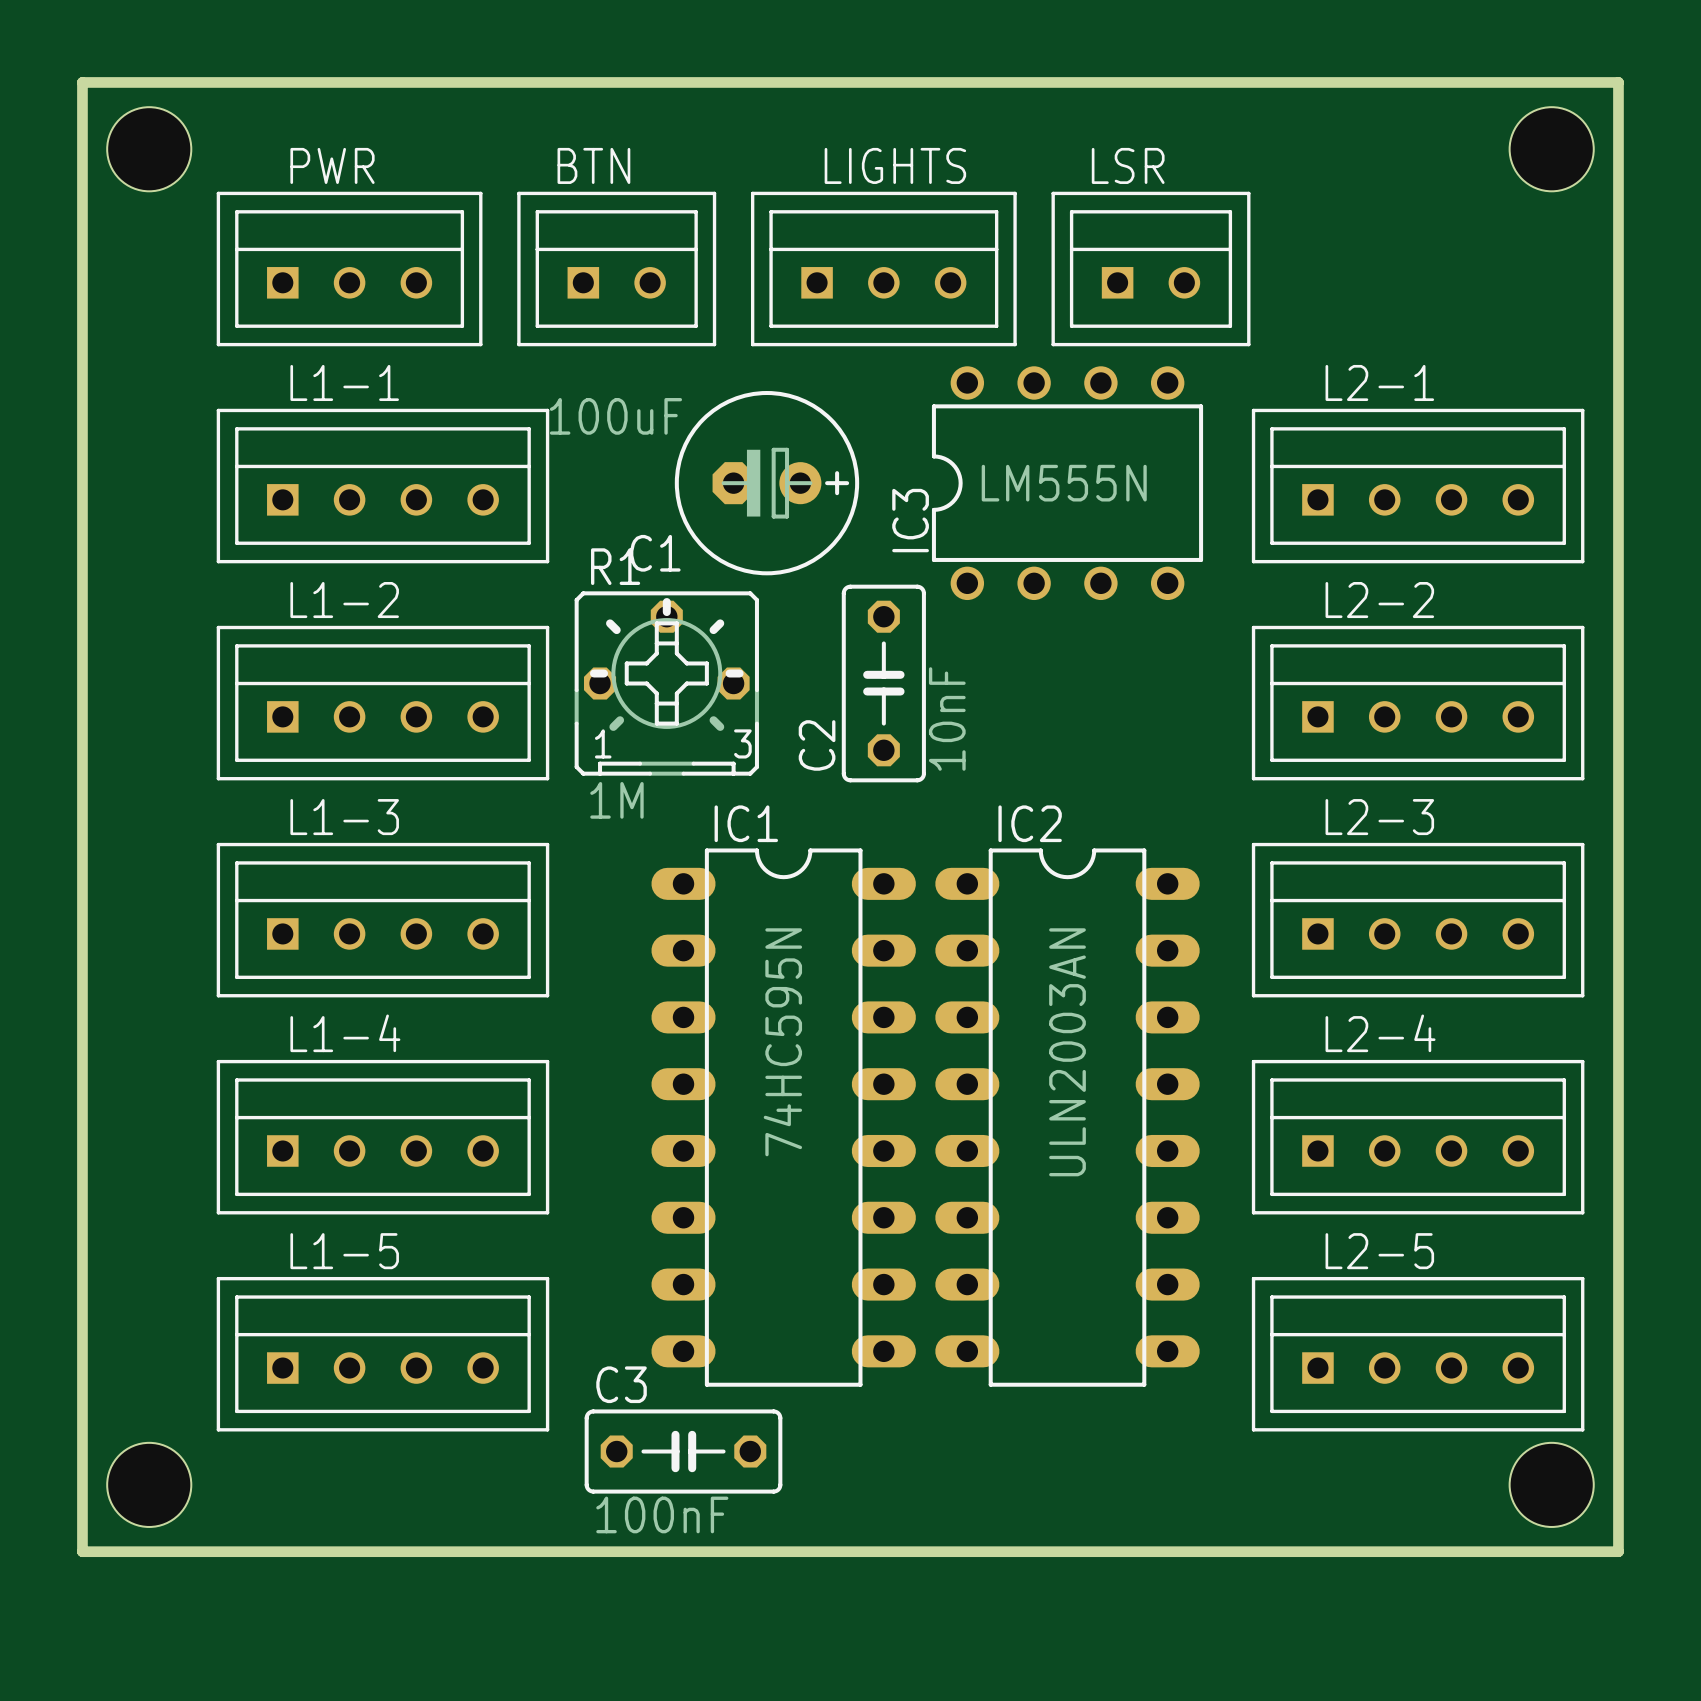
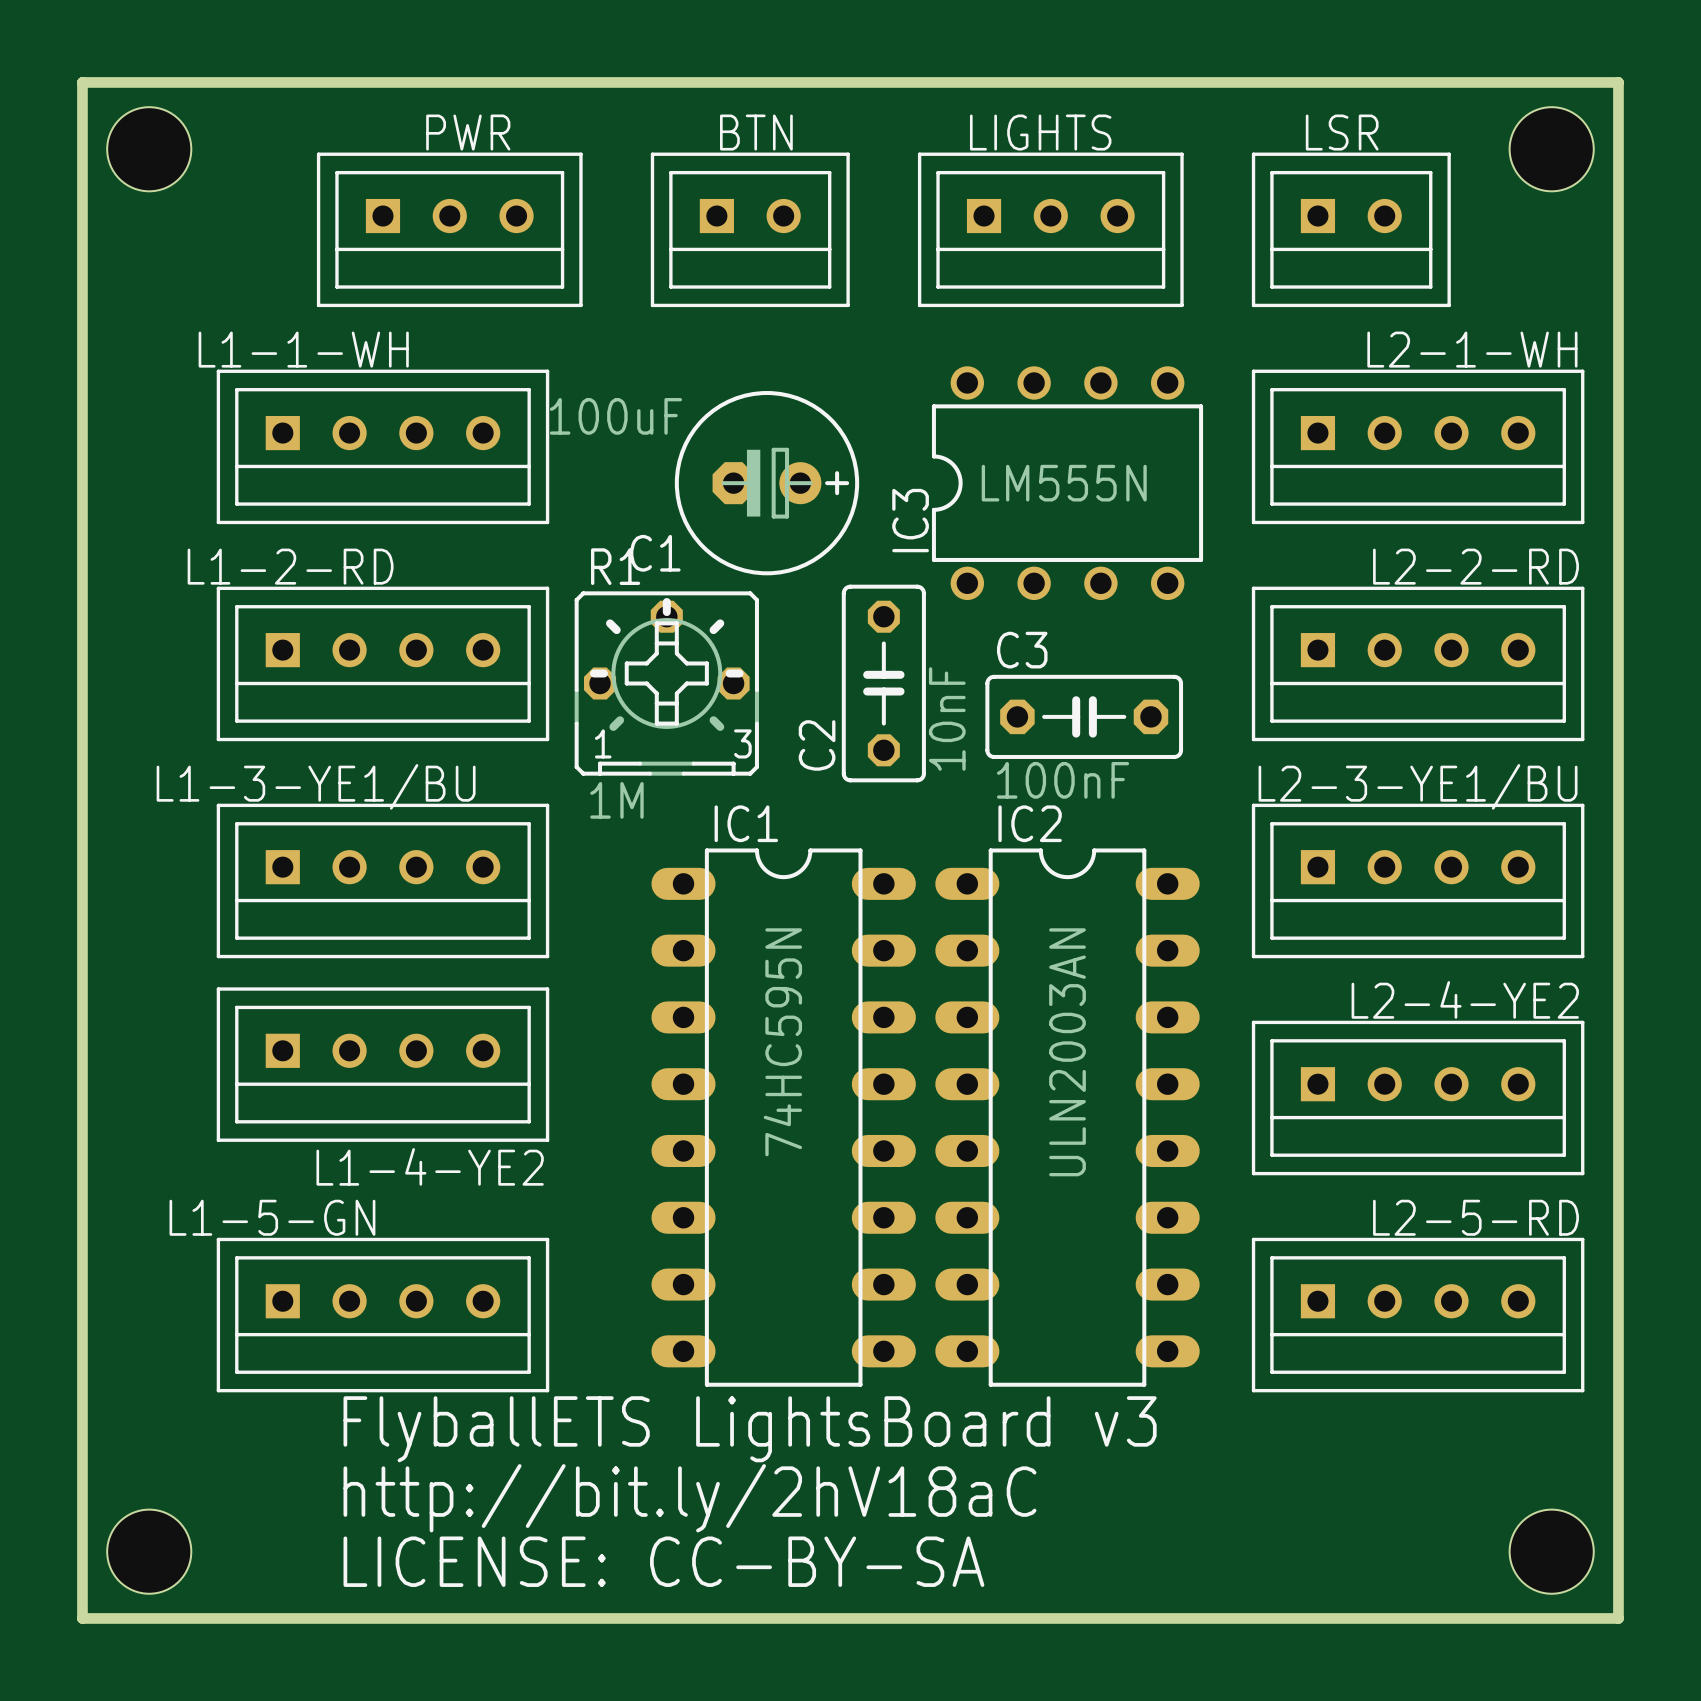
PWR: none -> (449, 229)
BTN: none -> (750, 229)
LIGHTS: none -> (1050, 229)
LSR: none -> (1351, 229)
PWR: (349, 269) -> none
BTN: (616, 269) -> none
LIGHTS: (883, 269) -> none
LSR: (1150, 269) -> none
L1-1-WH: none -> (382, 446)
L2-1-WH: none -> (1418, 446)
L1-1: (382, 486) -> none
L2-1: (1418, 486) -> none
L1-2-RD: none -> (382, 663)
L2-2-RD: none -> (1418, 663)
L1-2: (382, 703) -> none
L2-2: (1418, 703) -> none
L1-3-YE1/BU: none -> (382, 880)
L2-3-YE1/BU: none -> (1418, 880)
L1-3: (382, 920) -> none
L2-3: (1418, 920) -> none
L1-4-YE2: none -> (382, 1064)
L2-4-YE2: none -> (1418, 1098)
L1-4: (382, 1137) -> none
L2-4: (1418, 1137) -> none
L1-5-GN: none -> (382, 1315)
L2-5-RD: none -> (1418, 1315)
L1-5: (382, 1354) -> none
L2-5: (1418, 1354) -> none
C3 footprint: [584, 1409, 783, 1494] -> [985, 674, 1184, 759]
text: none -> FlyballETS LightsBoard v3 (750, 1429)
hole position: (149, 1484) -> (149, 1551)
hole position: (1551, 1484) -> (1551, 1551)
text: none -> http://bit.ly/2hV18aC (689, 1498)
board edge: (82, 1551) (1618, 1551) -> (82, 1551) (82, 1618) (1618, 1618) (1618, 1551)
text: none -> LICENSE: CC-BY-SA (663, 1561)

